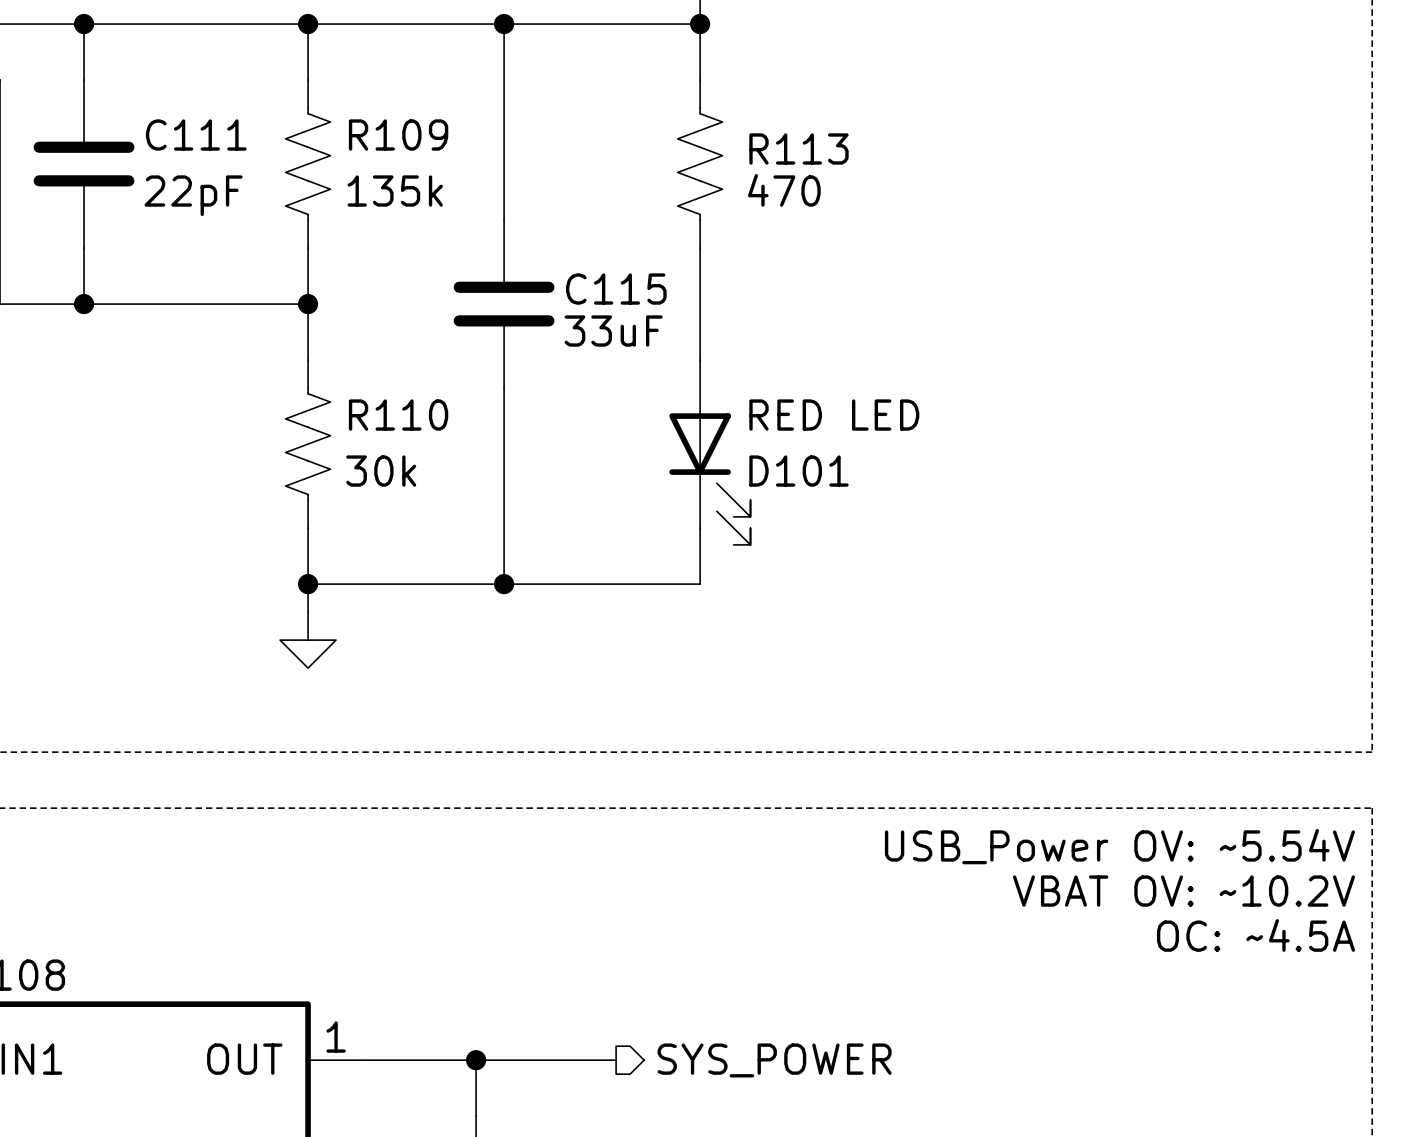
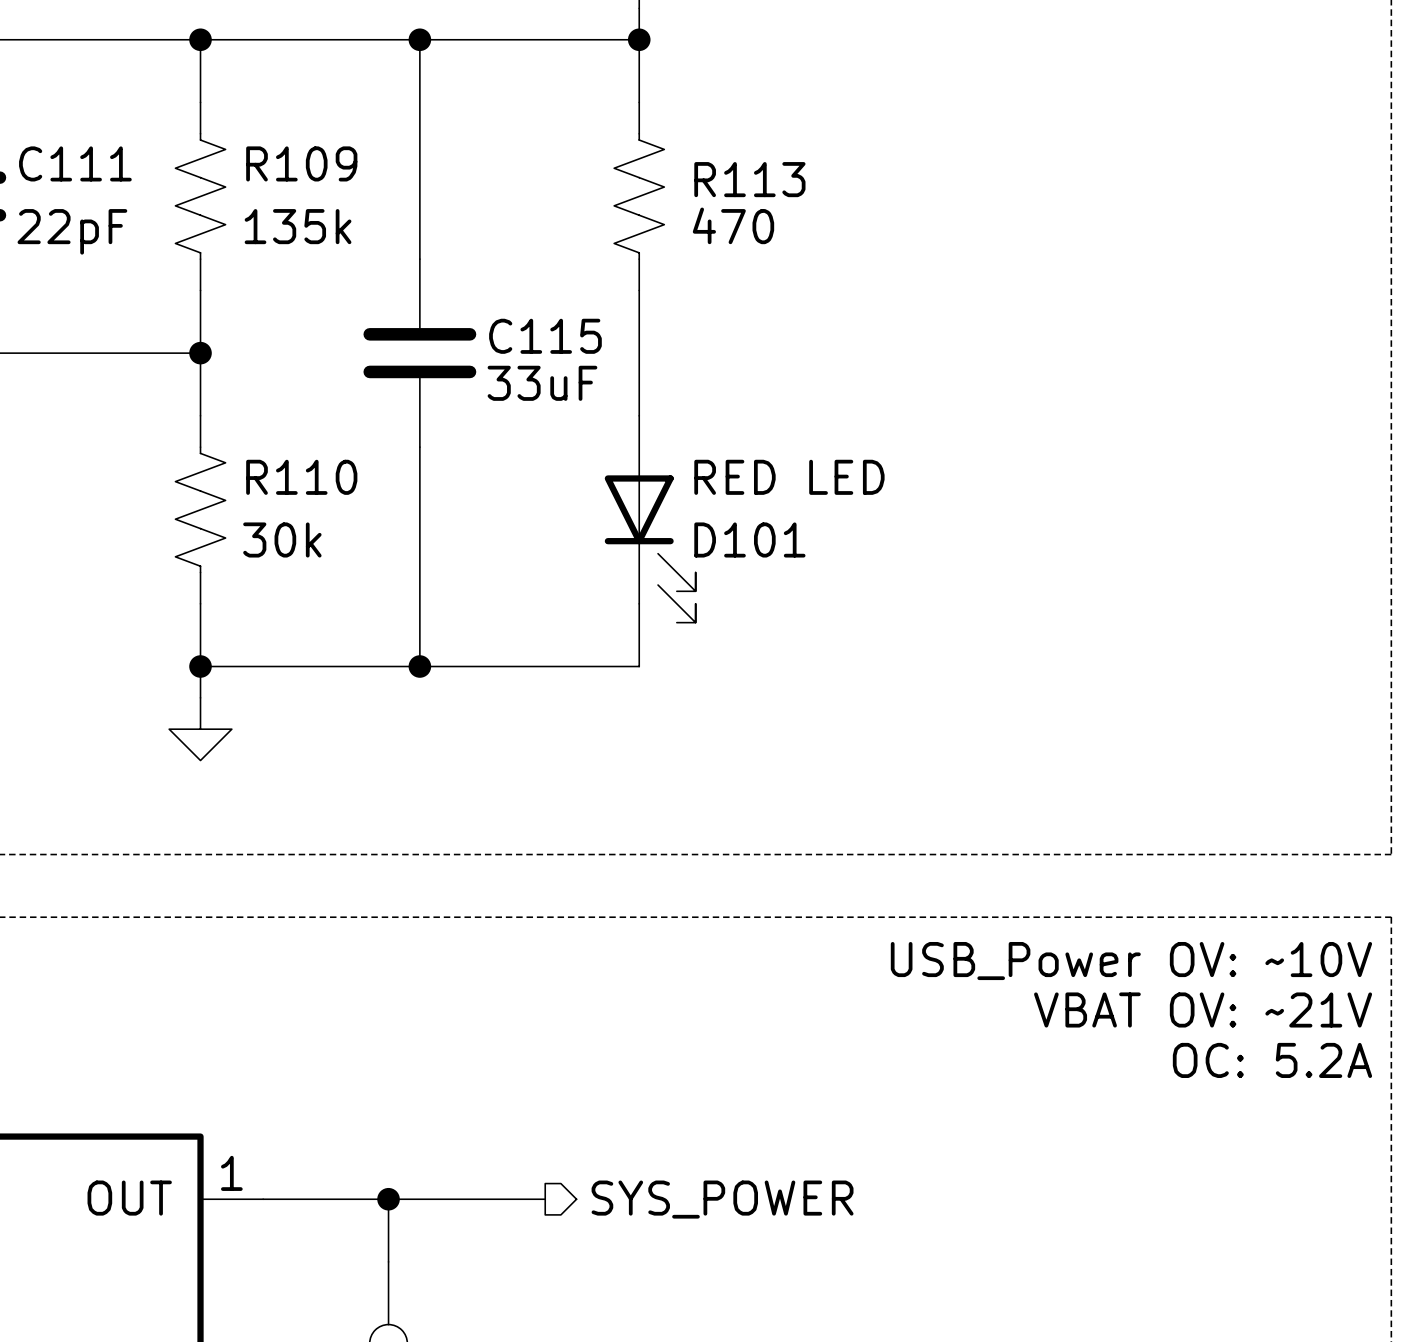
text: USB_Power OV: ~5.54V (1119, 846) -> USB_Power OV: ~10V (1131, 961)
text: VBAT OV: ~10.2V (1183, 891) -> VBAT OV: ~21V (1203, 1009)
text: OC: ~4.5A (1255, 935) -> OC: 5.2A (1272, 1060)

